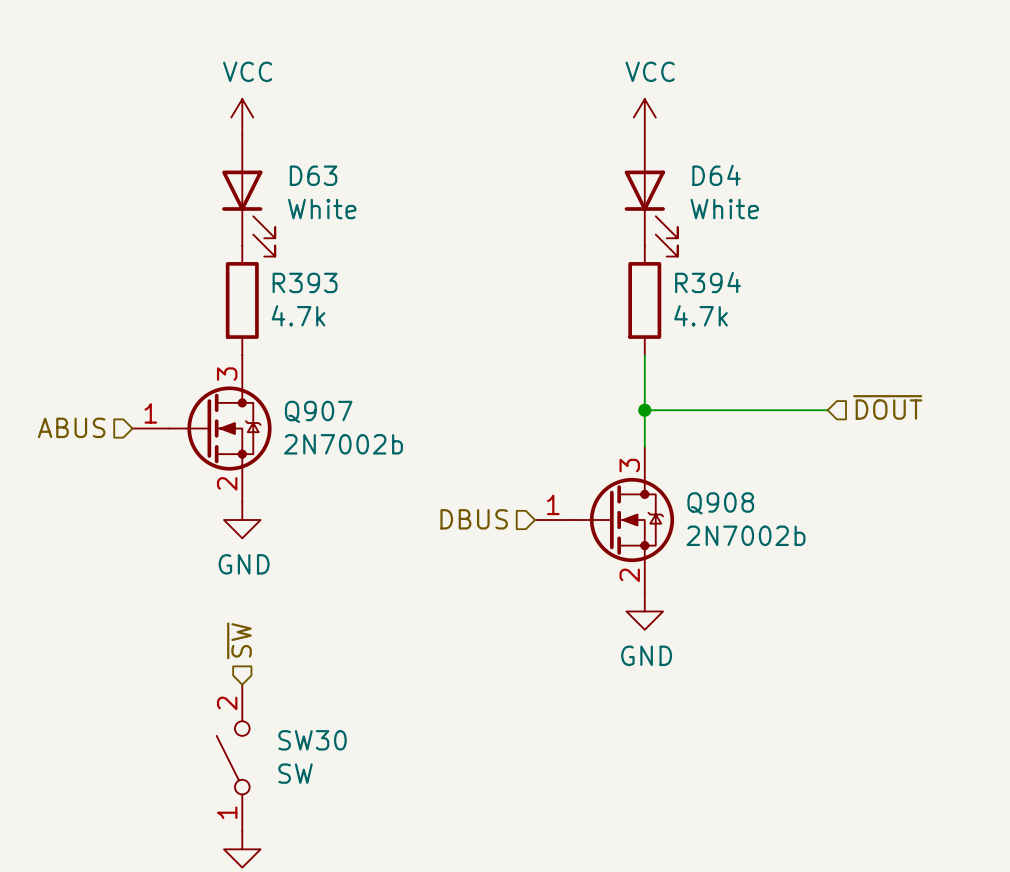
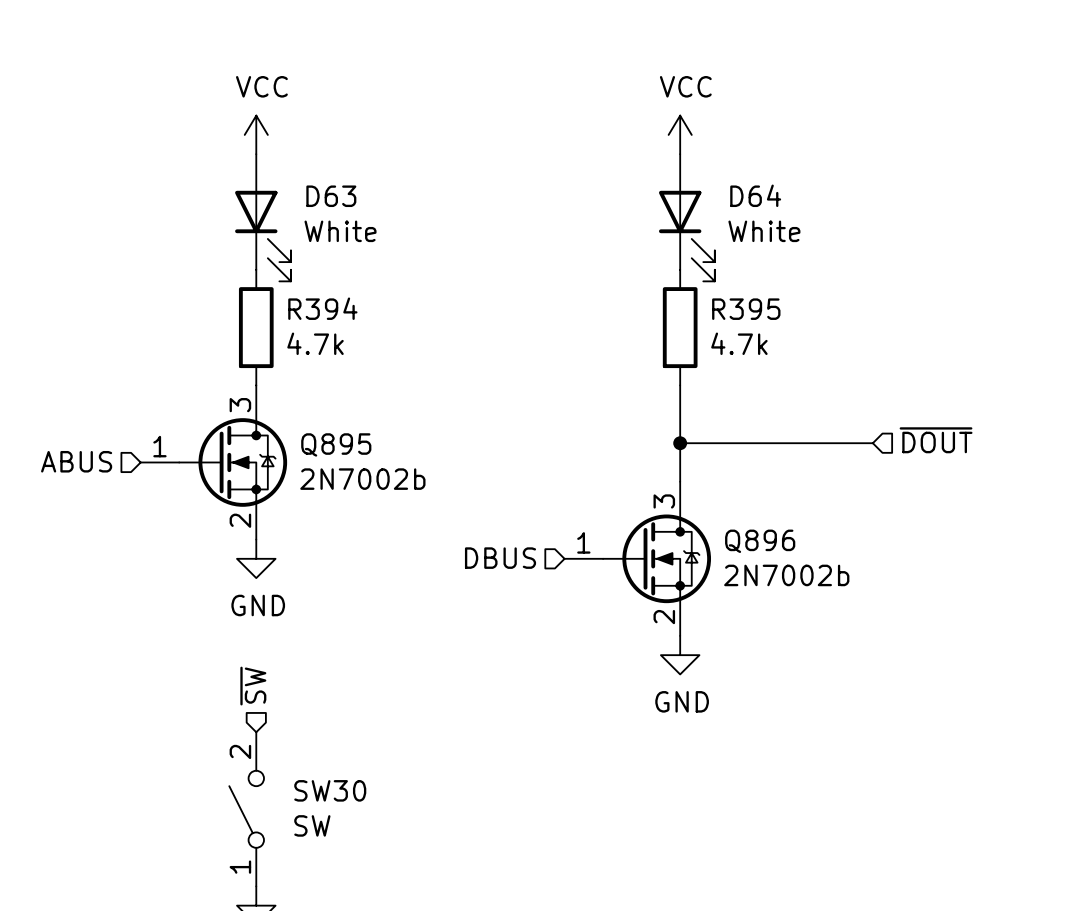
R393 name: R393 (305, 282) -> R394 (322, 308)
R394 name: R394 (707, 282) -> R395 (746, 309)
Q907 name: Q907 (318, 411) -> Q895 (336, 444)
Q908 name: Q908 (720, 503) -> Q896 (760, 541)

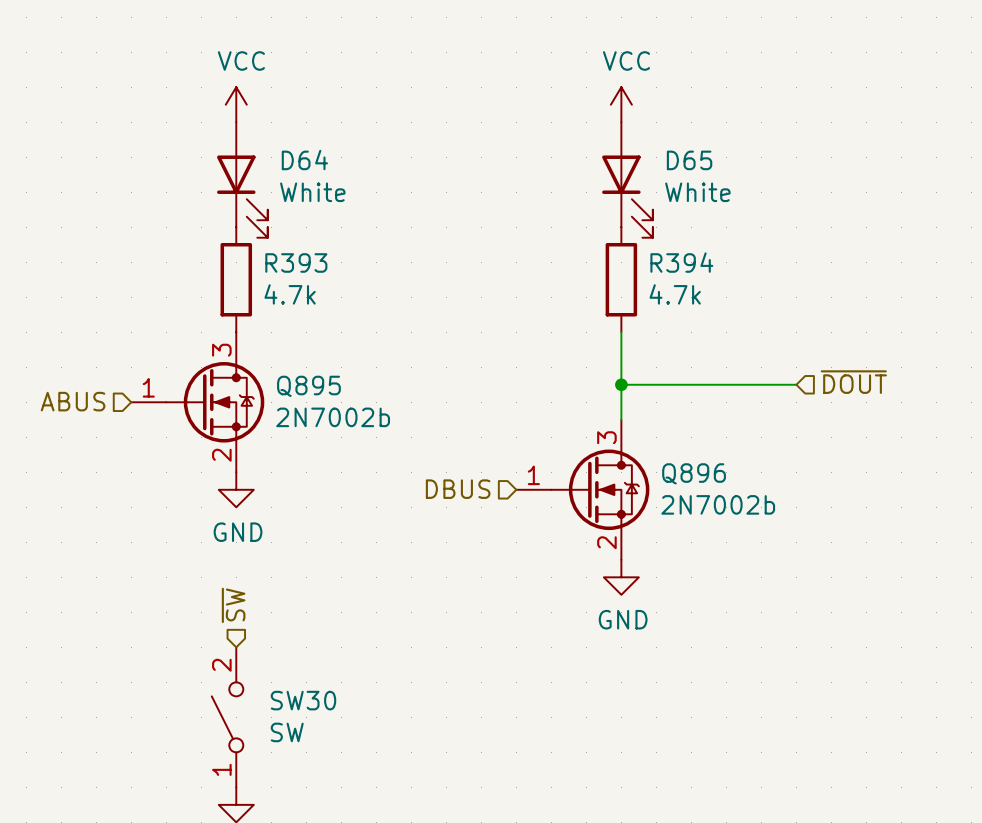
D64 name: D64 (755, 195) -> D65 (689, 160)
D63 name: D63 (331, 196) -> D64 (304, 159)
R394 name: R394 (322, 308) -> R393 (296, 262)
R395 name: R395 (746, 309) -> R394 (681, 262)

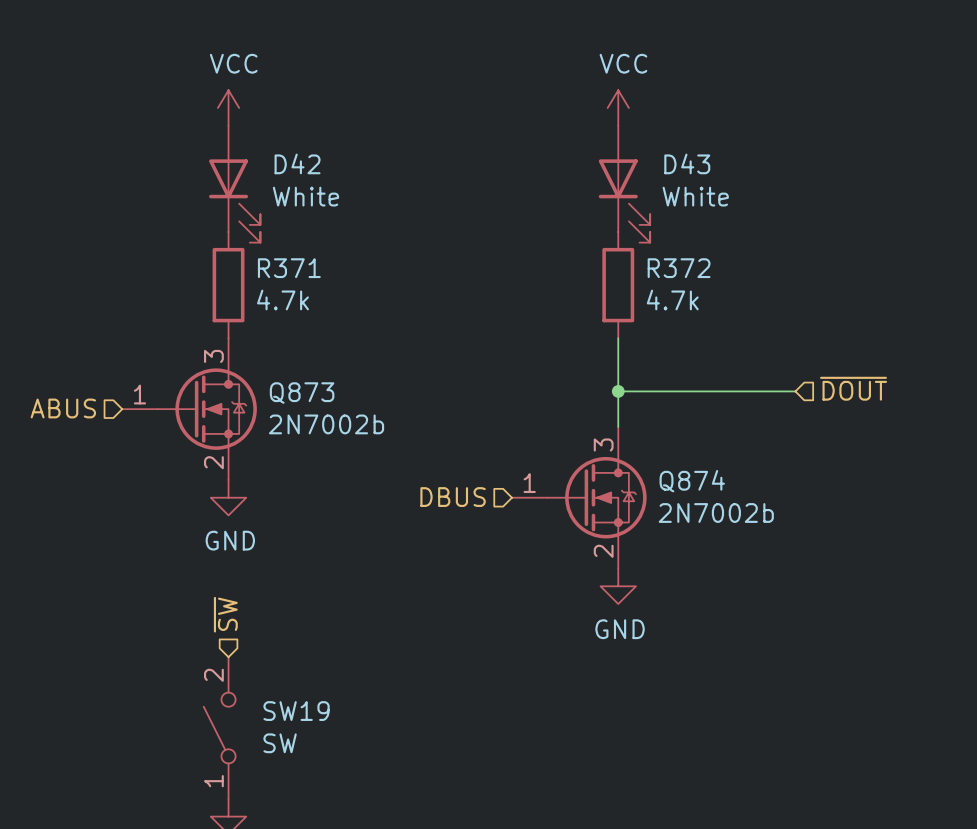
D64 name: D64 (304, 159) -> D42 (297, 163)
D65 name: D65 (689, 160) -> D43 (687, 163)
R393 name: R393 (296, 262) -> R371 (289, 268)
R394 name: R394 (681, 262) -> R372 (679, 268)
Q895 name: Q895 (308, 386) -> Q873 (302, 393)
Q896 name: Q896 (694, 473) -> Q874 (692, 481)
SW30 name: SW30 (303, 700) -> SW19 (296, 711)

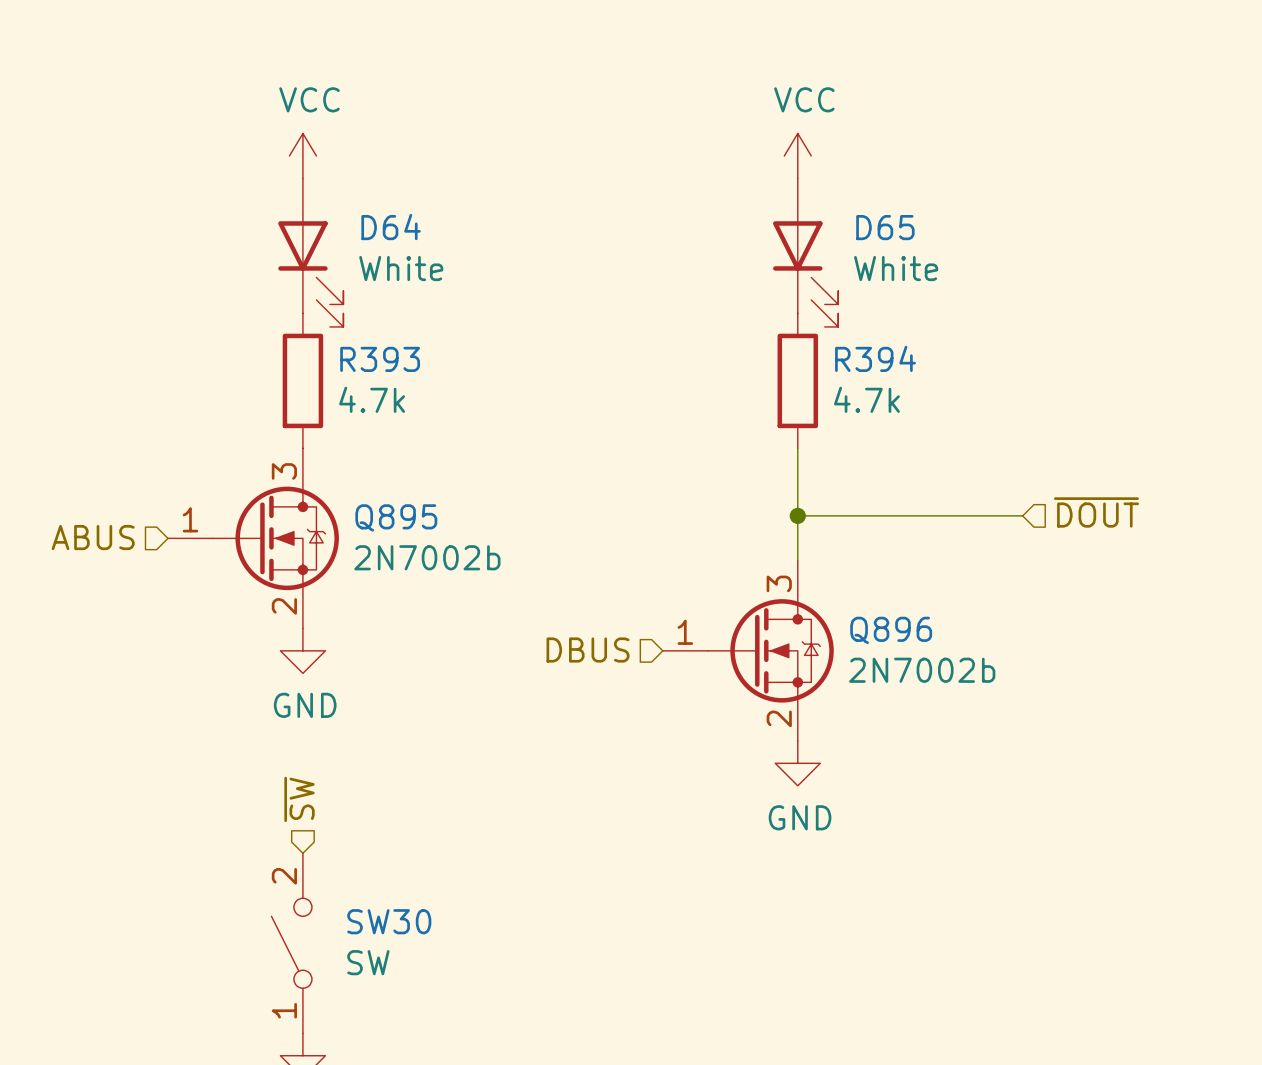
D42 name: D42 (297, 163) -> D64 (391, 227)
D43 name: D43 (687, 163) -> D65 (885, 227)
R371 name: R371 (289, 268) -> R393 (380, 359)
R372 name: R372 (679, 268) -> R394 (875, 358)
Q873 name: Q873 (302, 393) -> Q895 (396, 517)
Q874 name: Q874 (692, 481) -> Q896 (891, 630)
SW19 name: SW19 (296, 711) -> SW30 (389, 921)

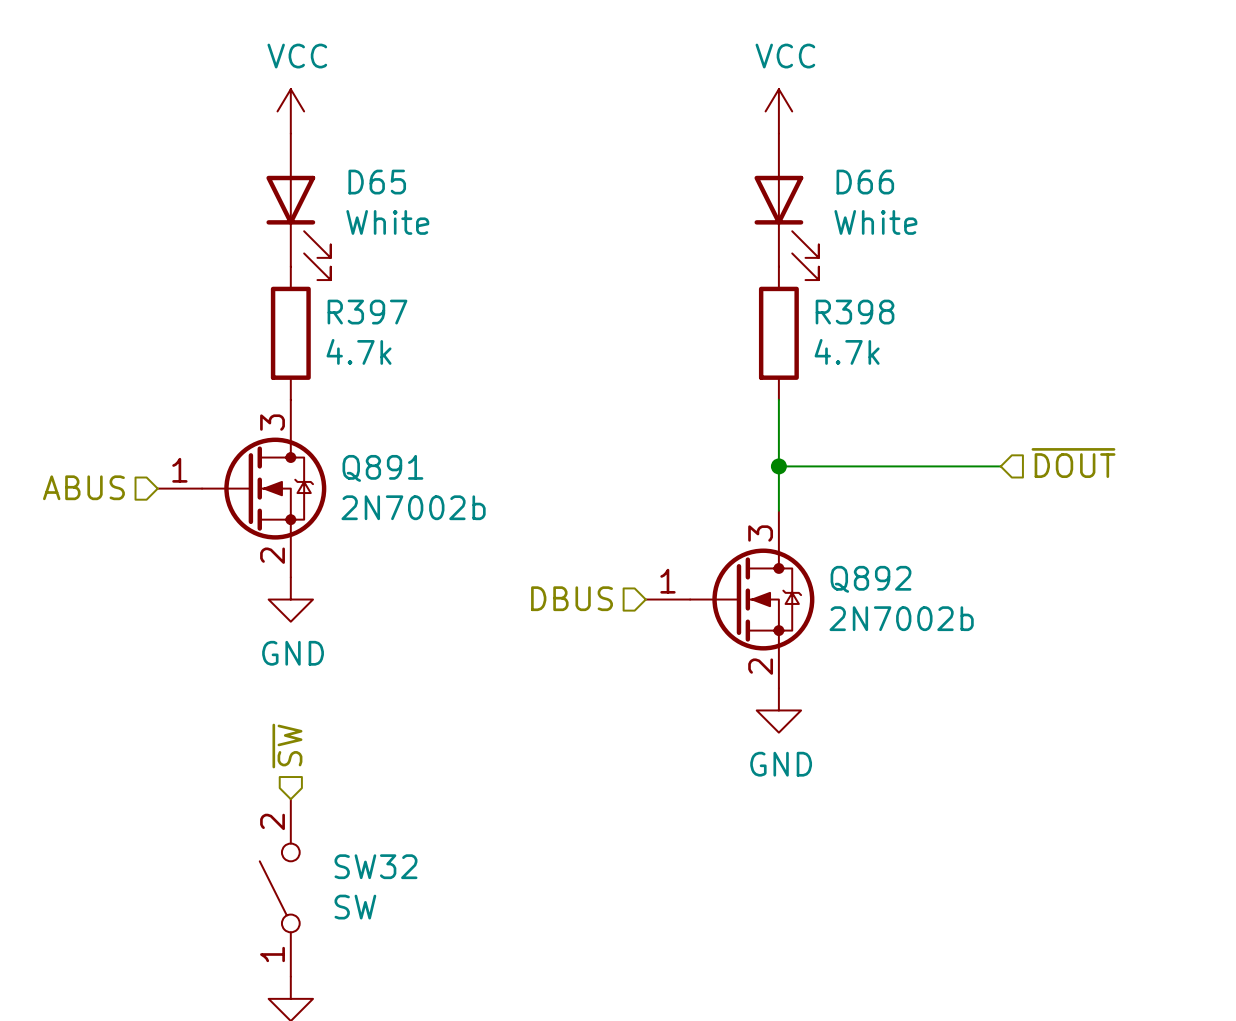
D64 name: D64 (391, 227) -> D65 (377, 182)
D65 name: D65 (885, 227) -> D66 (865, 182)
R394 name: R394 (875, 358) -> R398 (855, 312)
R393 name: R393 (380, 359) -> R397 (367, 312)
Q895 name: Q895 (396, 517) -> Q891 (382, 468)
Q896 name: Q896 (891, 630) -> Q892 (871, 579)
SW30 name: SW30 (389, 921) -> SW32 (375, 866)

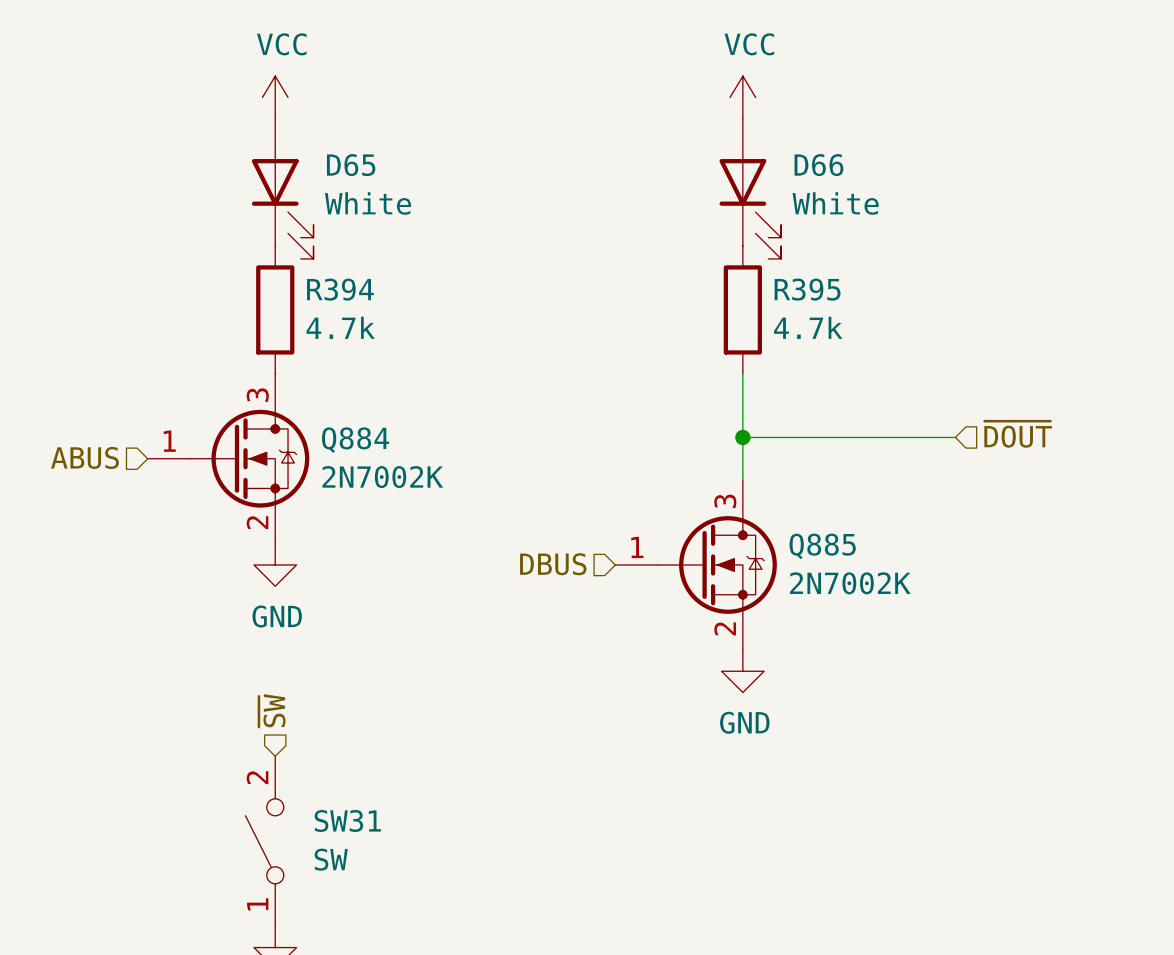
R397 name: R397 (367, 312) -> R394 (340, 289)
R398 name: R398 (855, 312) -> R395 (807, 289)
Q891 name: Q891 (382, 468) -> Q884 (355, 440)
Q891 value: 2N7002b (413, 507) -> 2N7002K (382, 477)
Q892 name: Q892 (871, 579) -> Q885 (822, 546)
Q892 value: 2N7002b (901, 618) -> 2N7002K (850, 583)
SW32 name: SW32 (375, 866) -> SW31 (347, 820)

